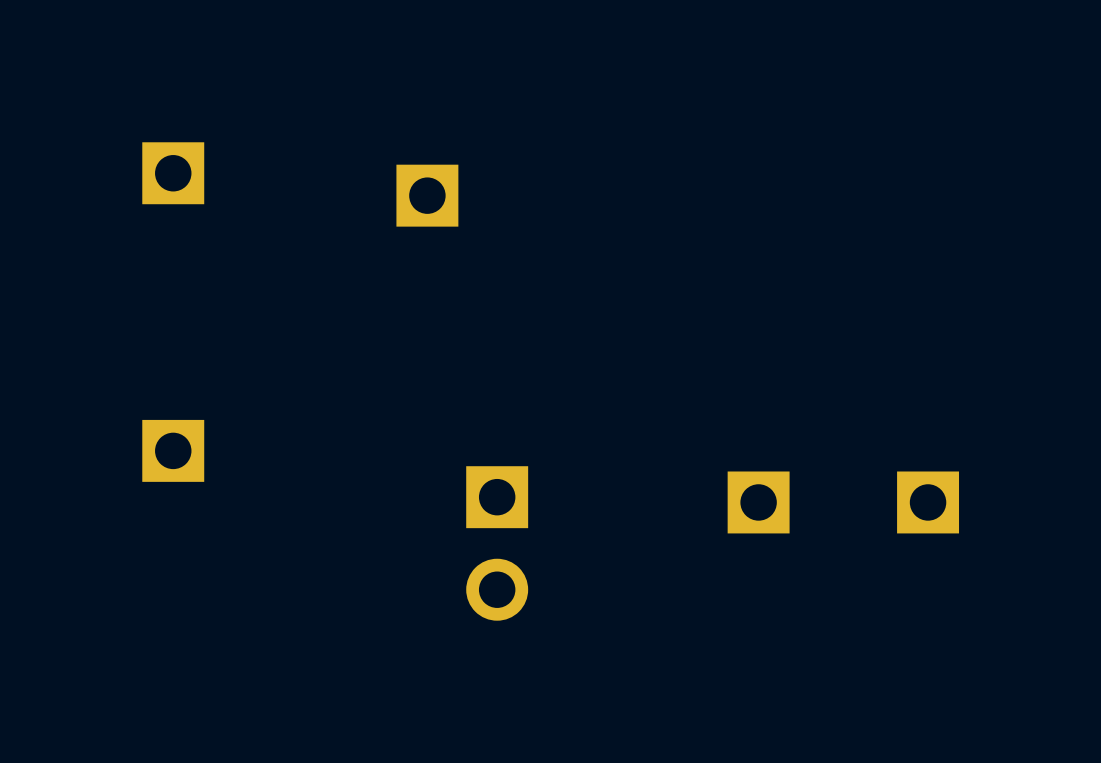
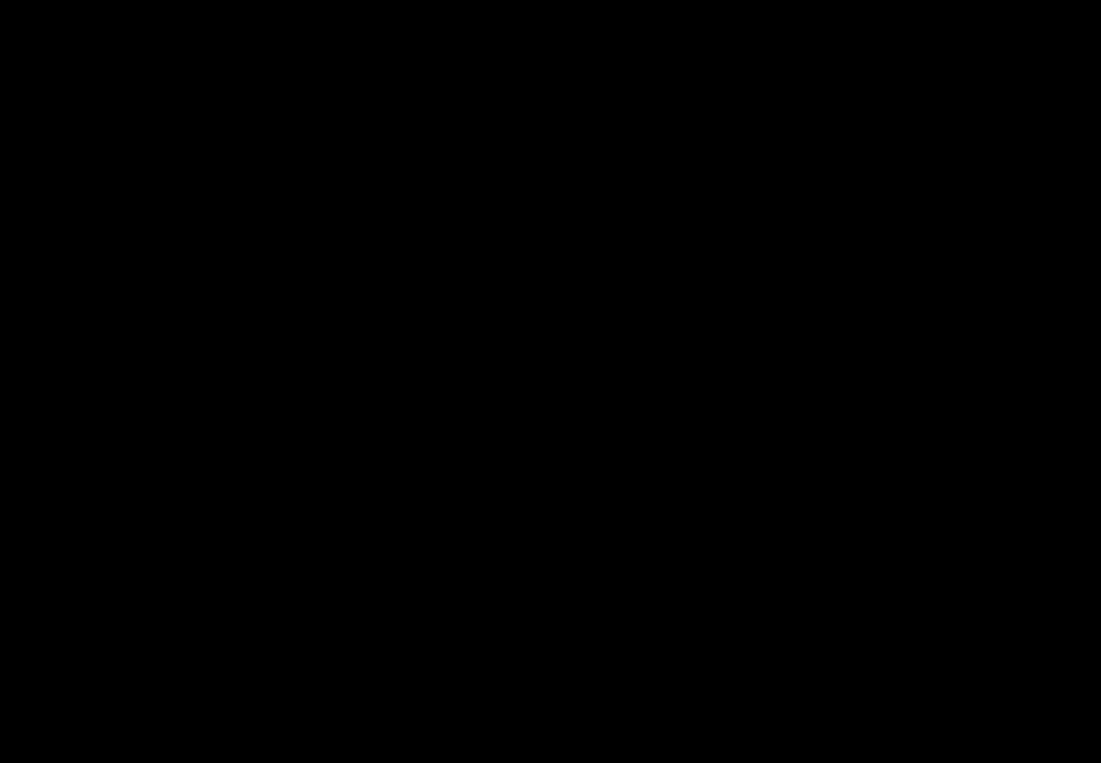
part: (173, 173) -> none
part: (427, 195) -> none
part: (173, 450) -> none
part: (758, 502) -> none
part: (928, 502) -> none
part: (497, 543) -> none

